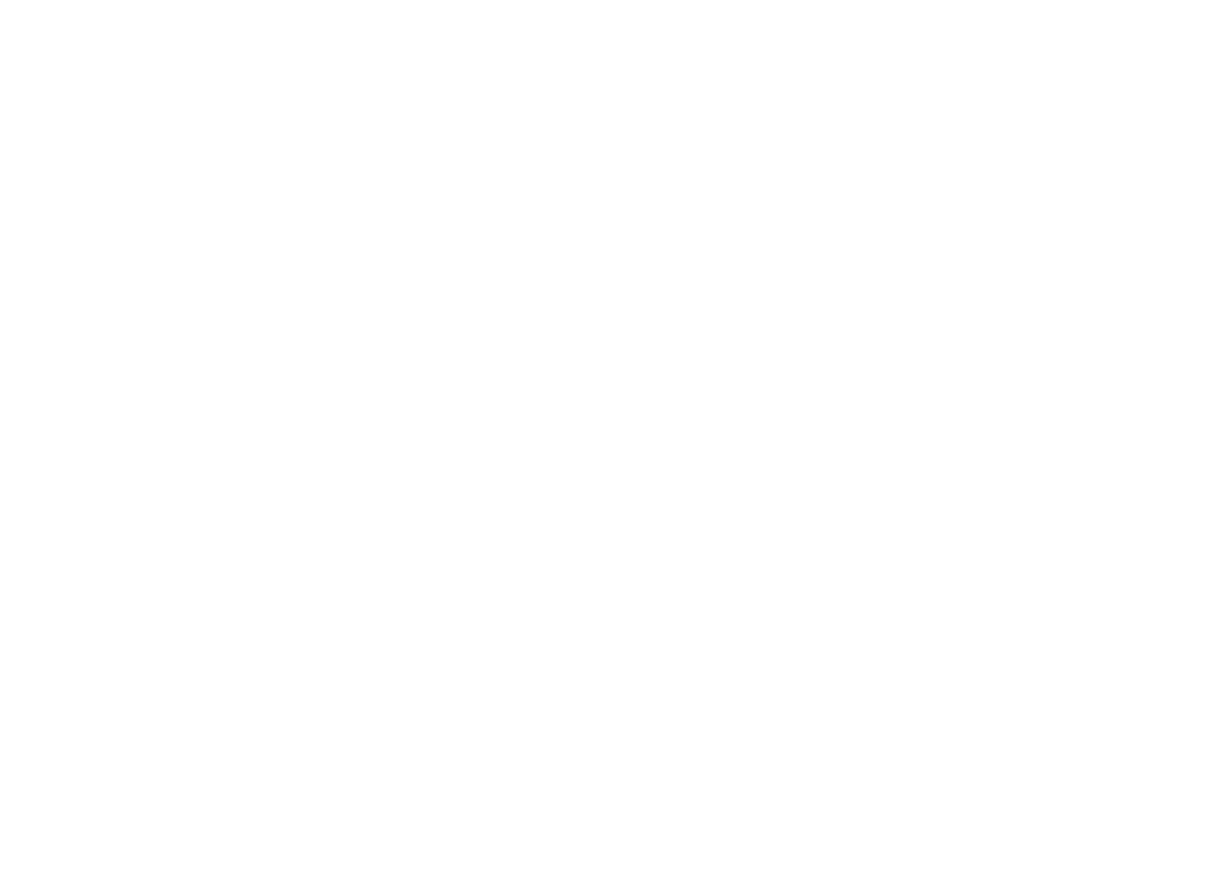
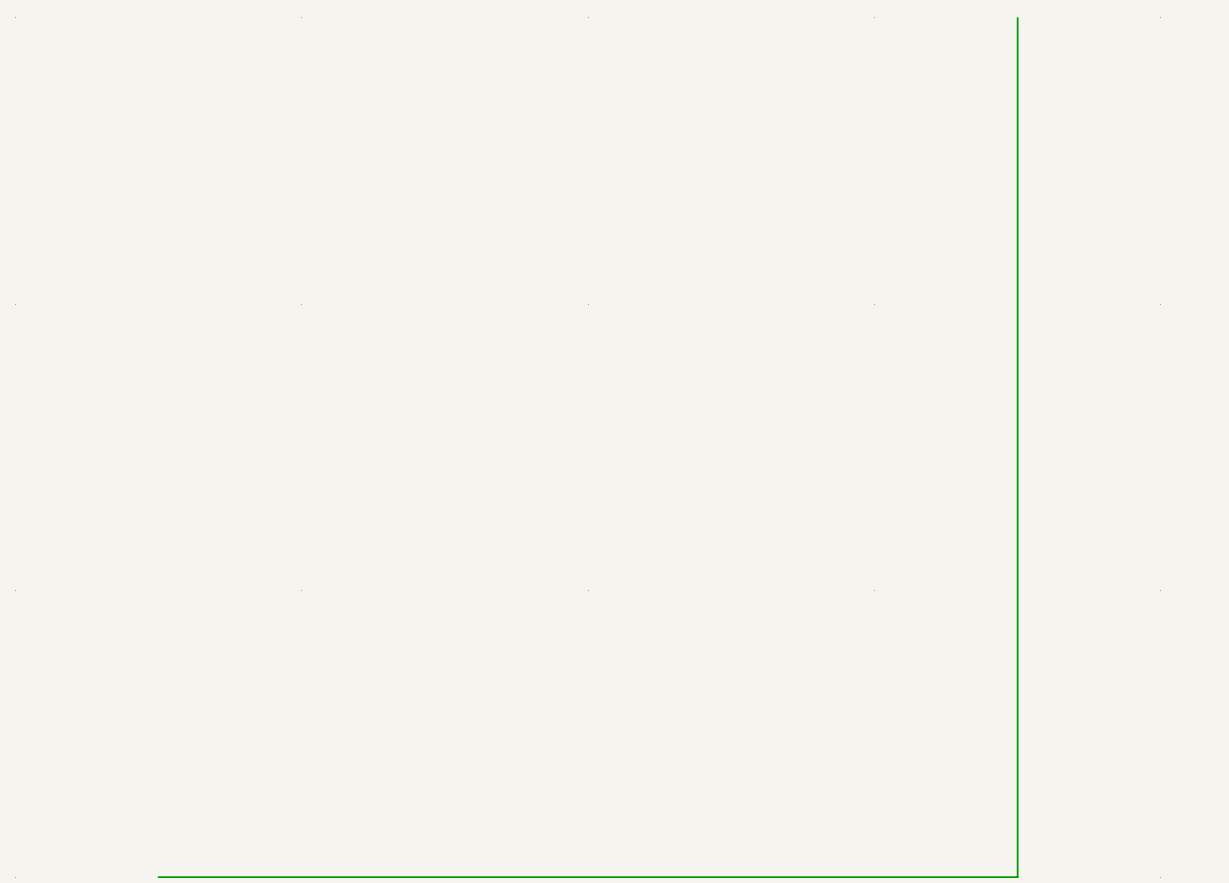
wire: none -> (1017, 17) (1017, 877) (158, 877)

